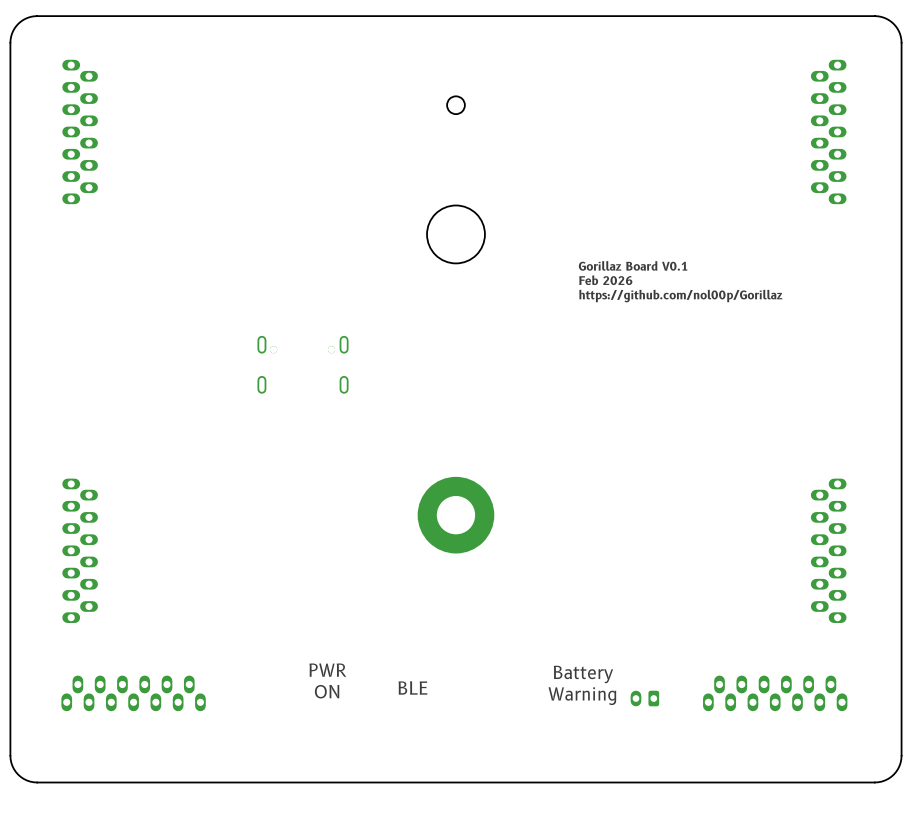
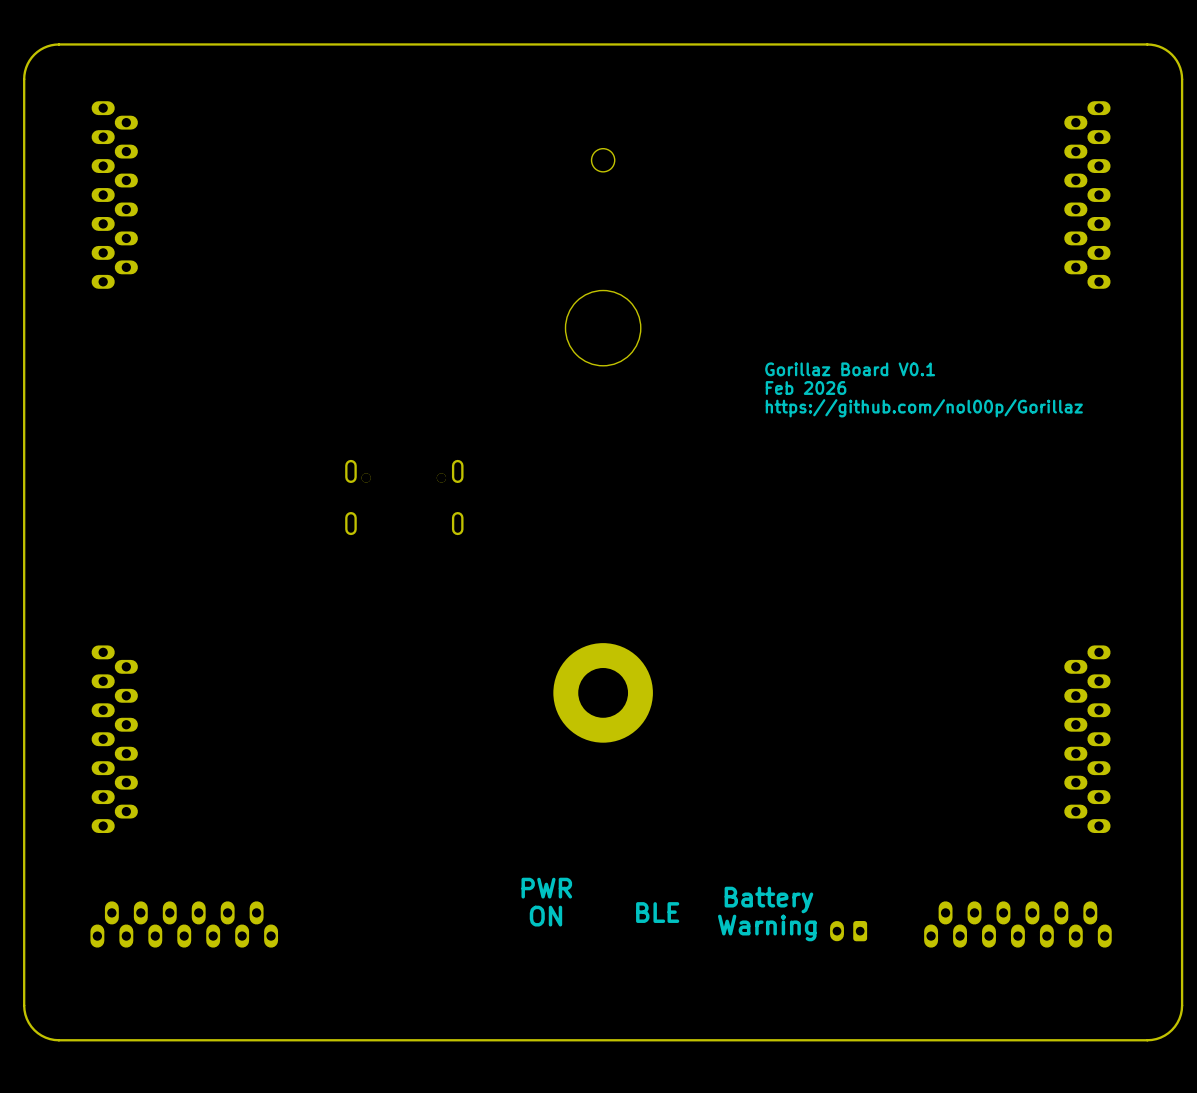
text position: PWR (327, 670) -> PWR (546, 888)
text: none -> BLE (657, 912)
text: BLE (412, 687) -> ON (545, 916)
text: ON (327, 691) -> none

